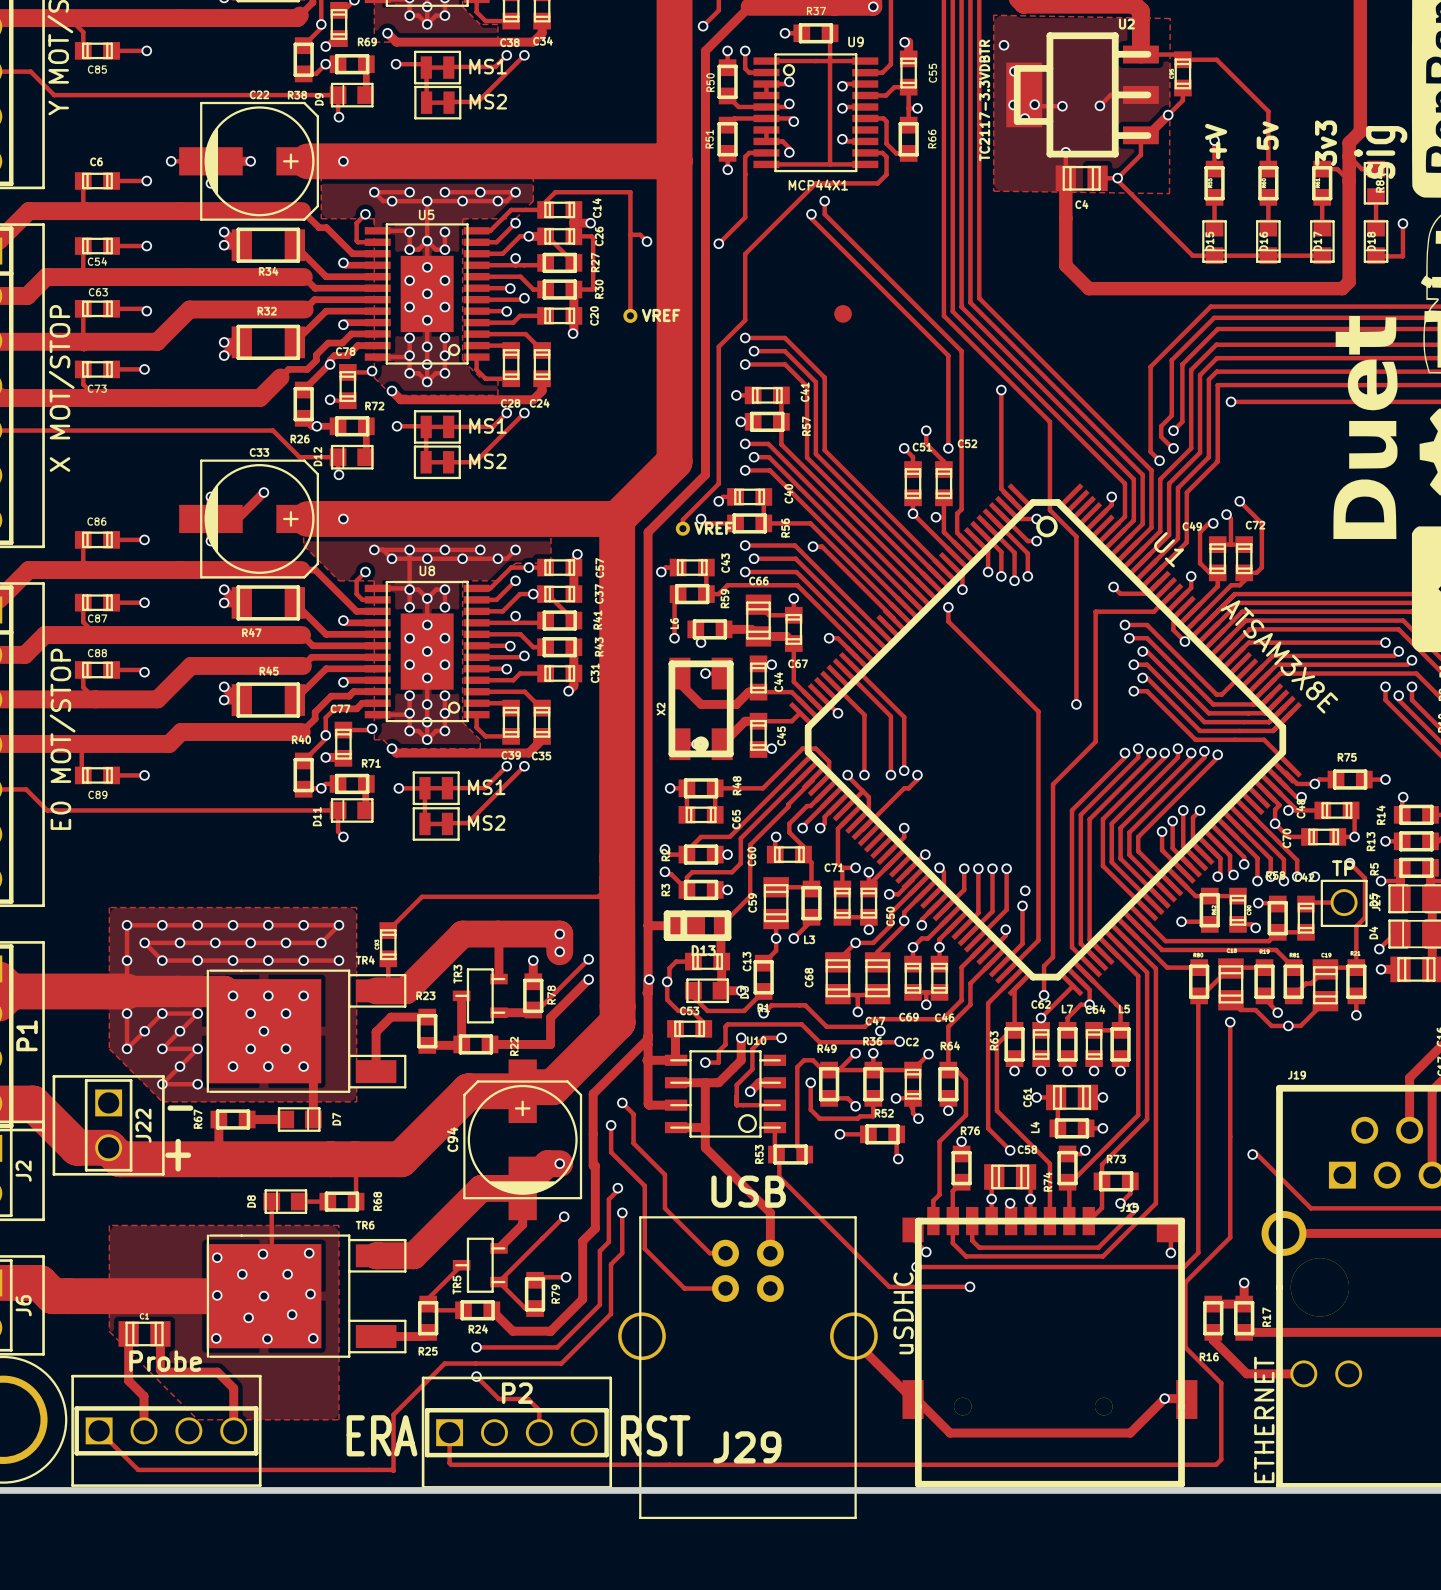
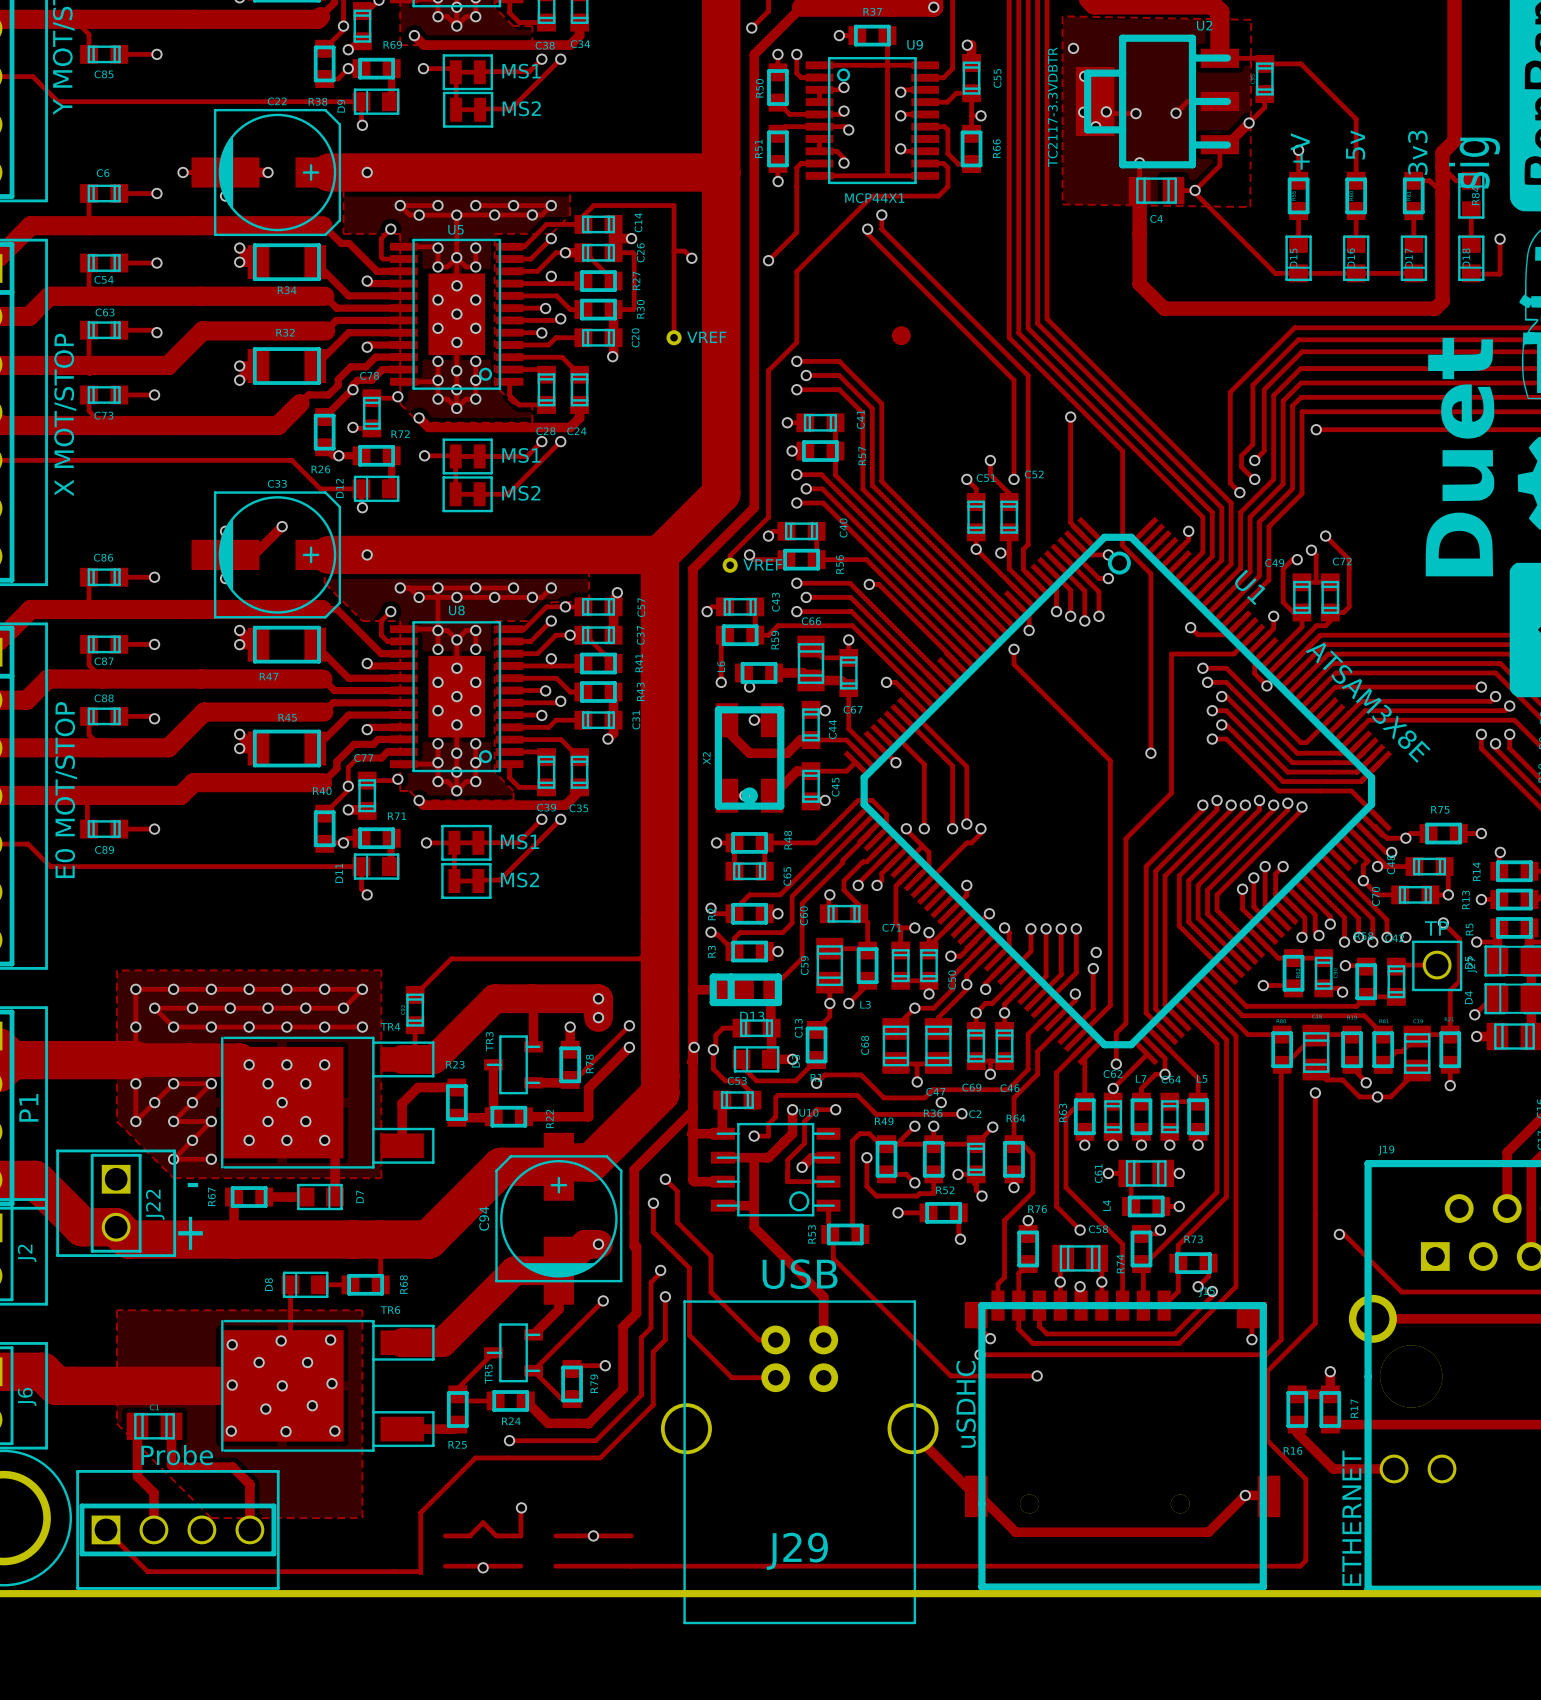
track: (476, 1376) (498, 1399) (528, 1399) (539, 1410) (539, 1432) -> none
via position: (476, 1376) -> (521, 1507)
track: none -> (521, 1507) (520, 1535) (496, 1535) (483, 1522) (469, 1535) (445, 1535)
track: (449, 1432) (451, 1464) -> (445, 1566) (482, 1566)
P2: (516, 1432) -> none
text: ERA (381, 1435) -> none
text: RST (655, 1435) -> none
track: none -> (555, 1535) (631, 1535)
via: none -> (593, 1535)
track: (487, 1464) (519, 1464) -> none
via: none -> (483, 1567)

